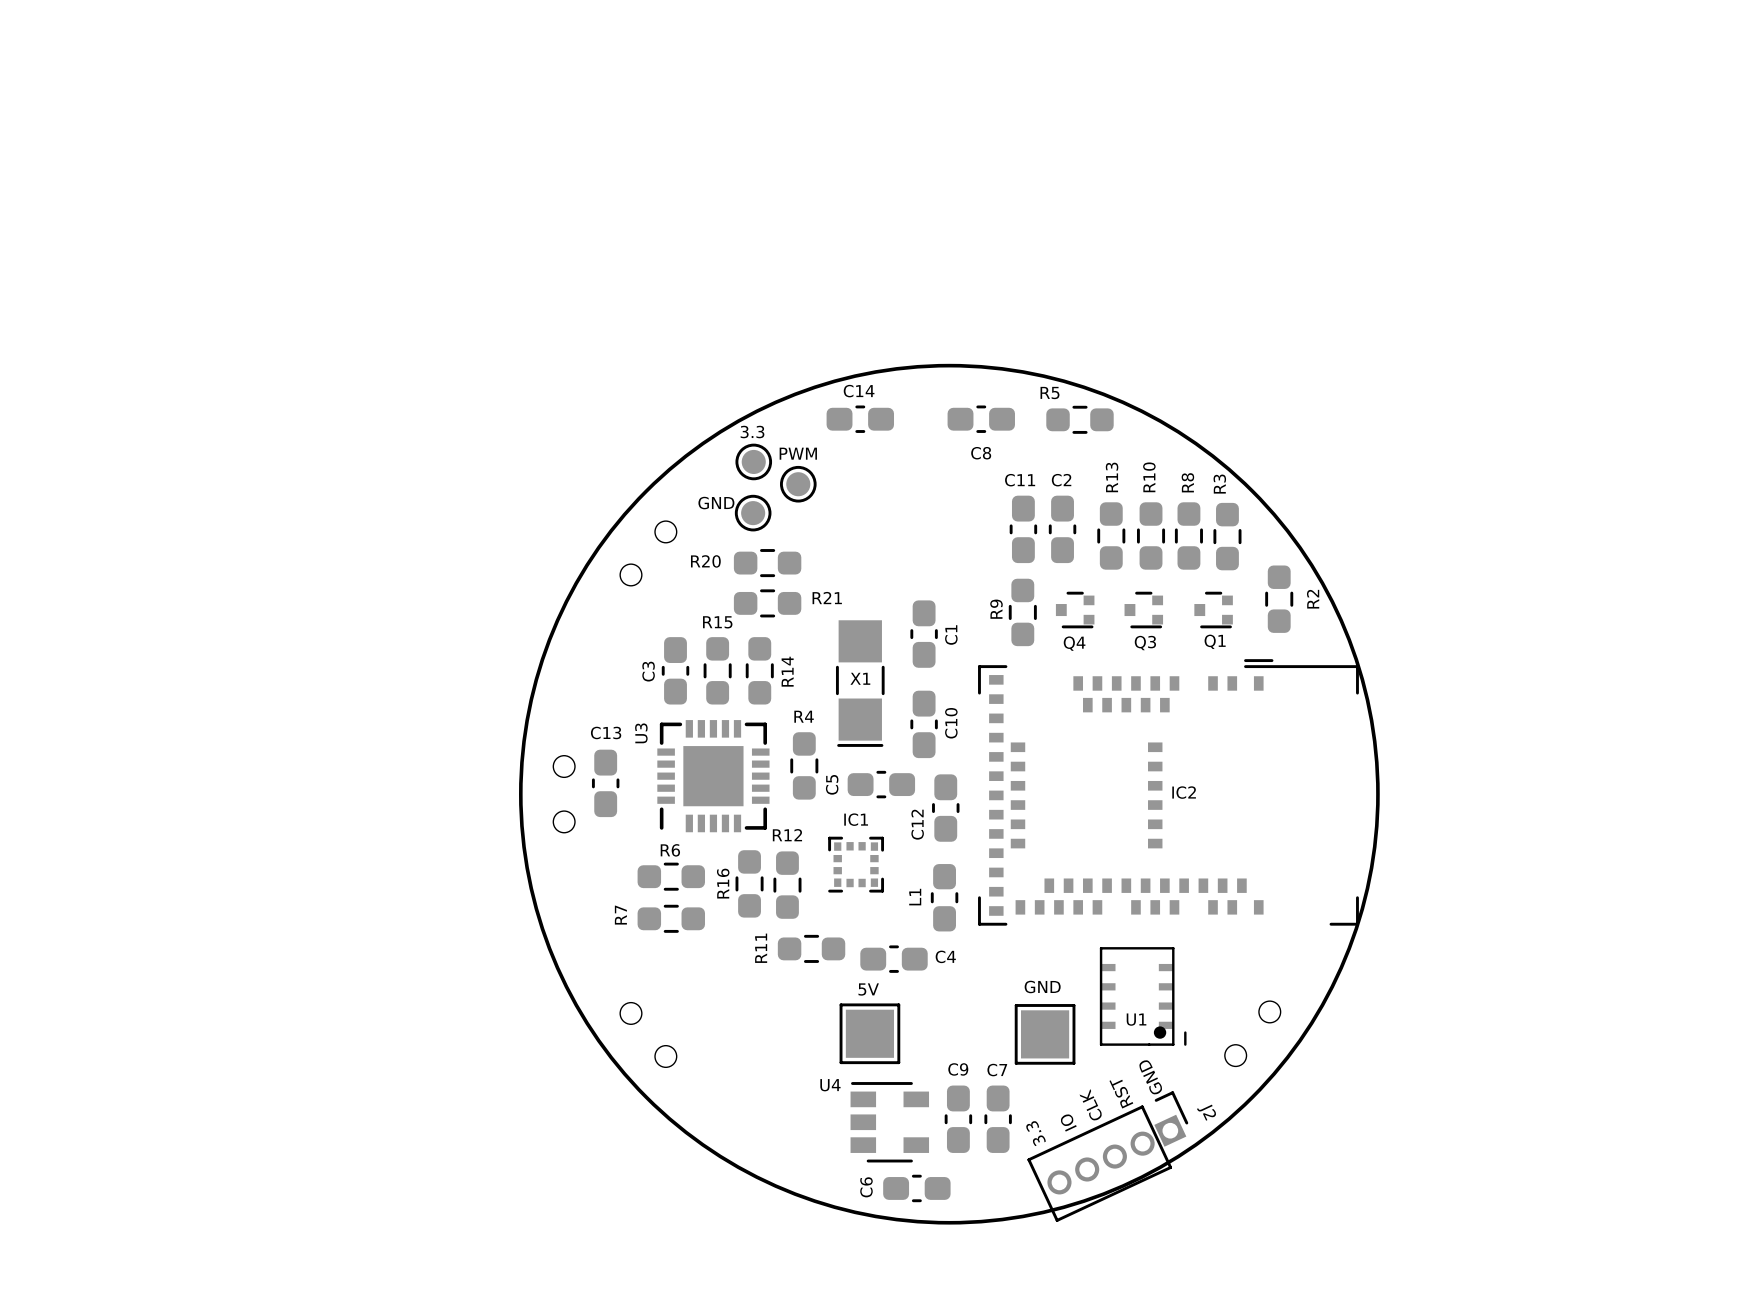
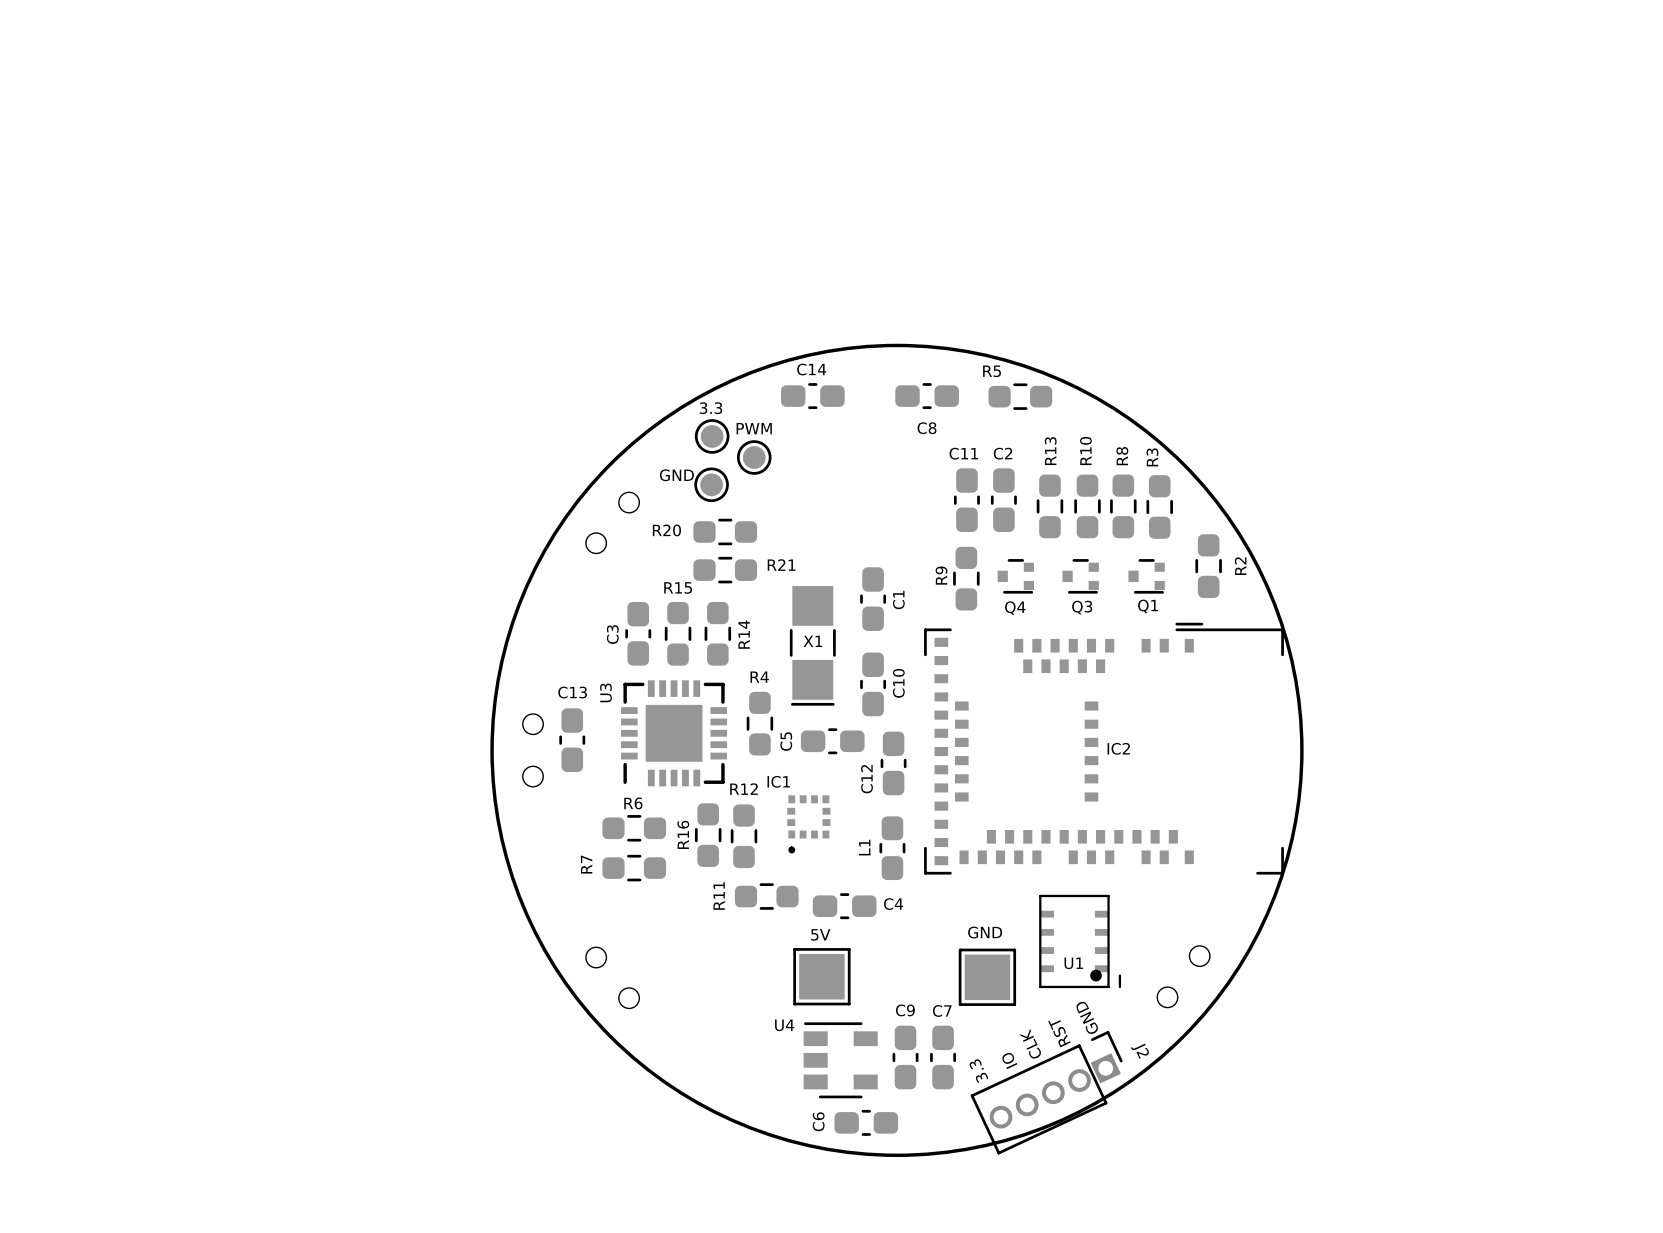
IC1 footprint: [828, 836, 885, 893] -> [787, 795, 831, 854]

